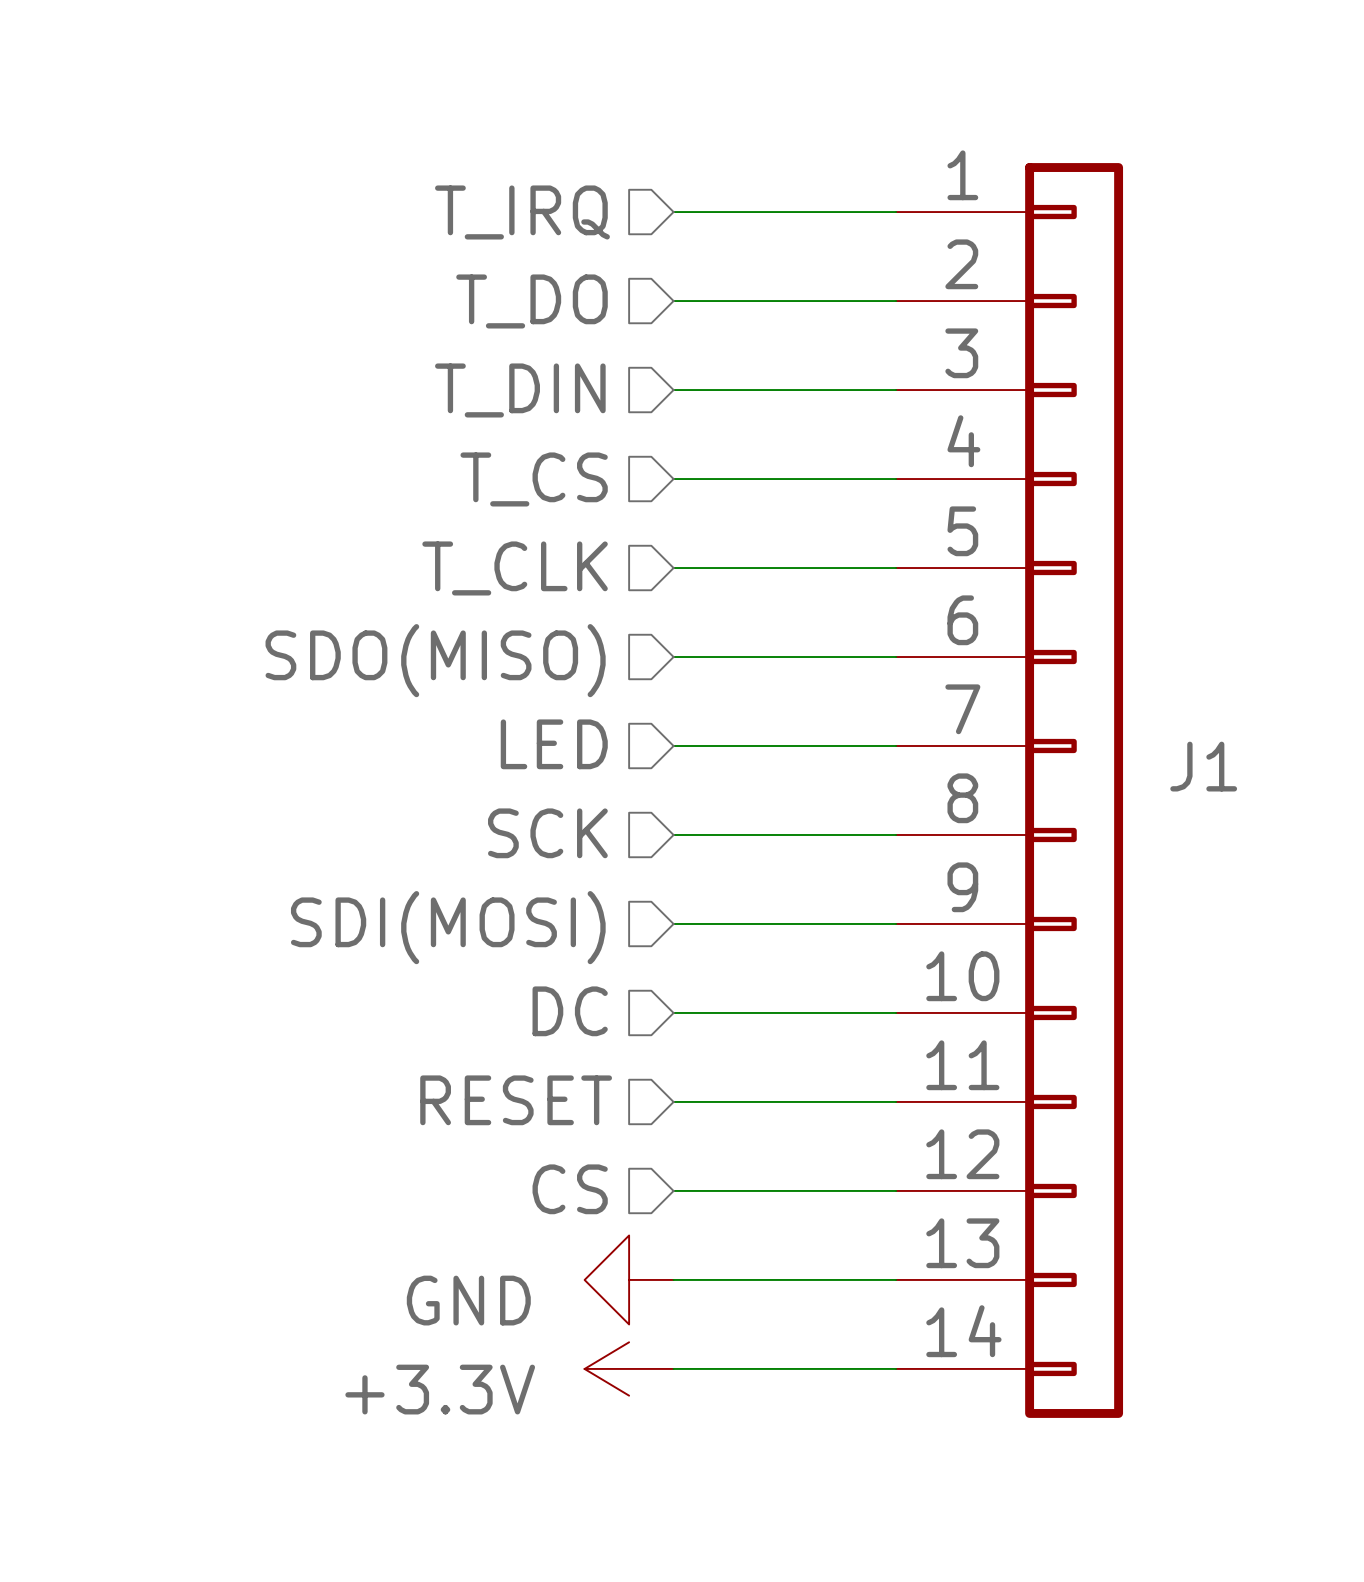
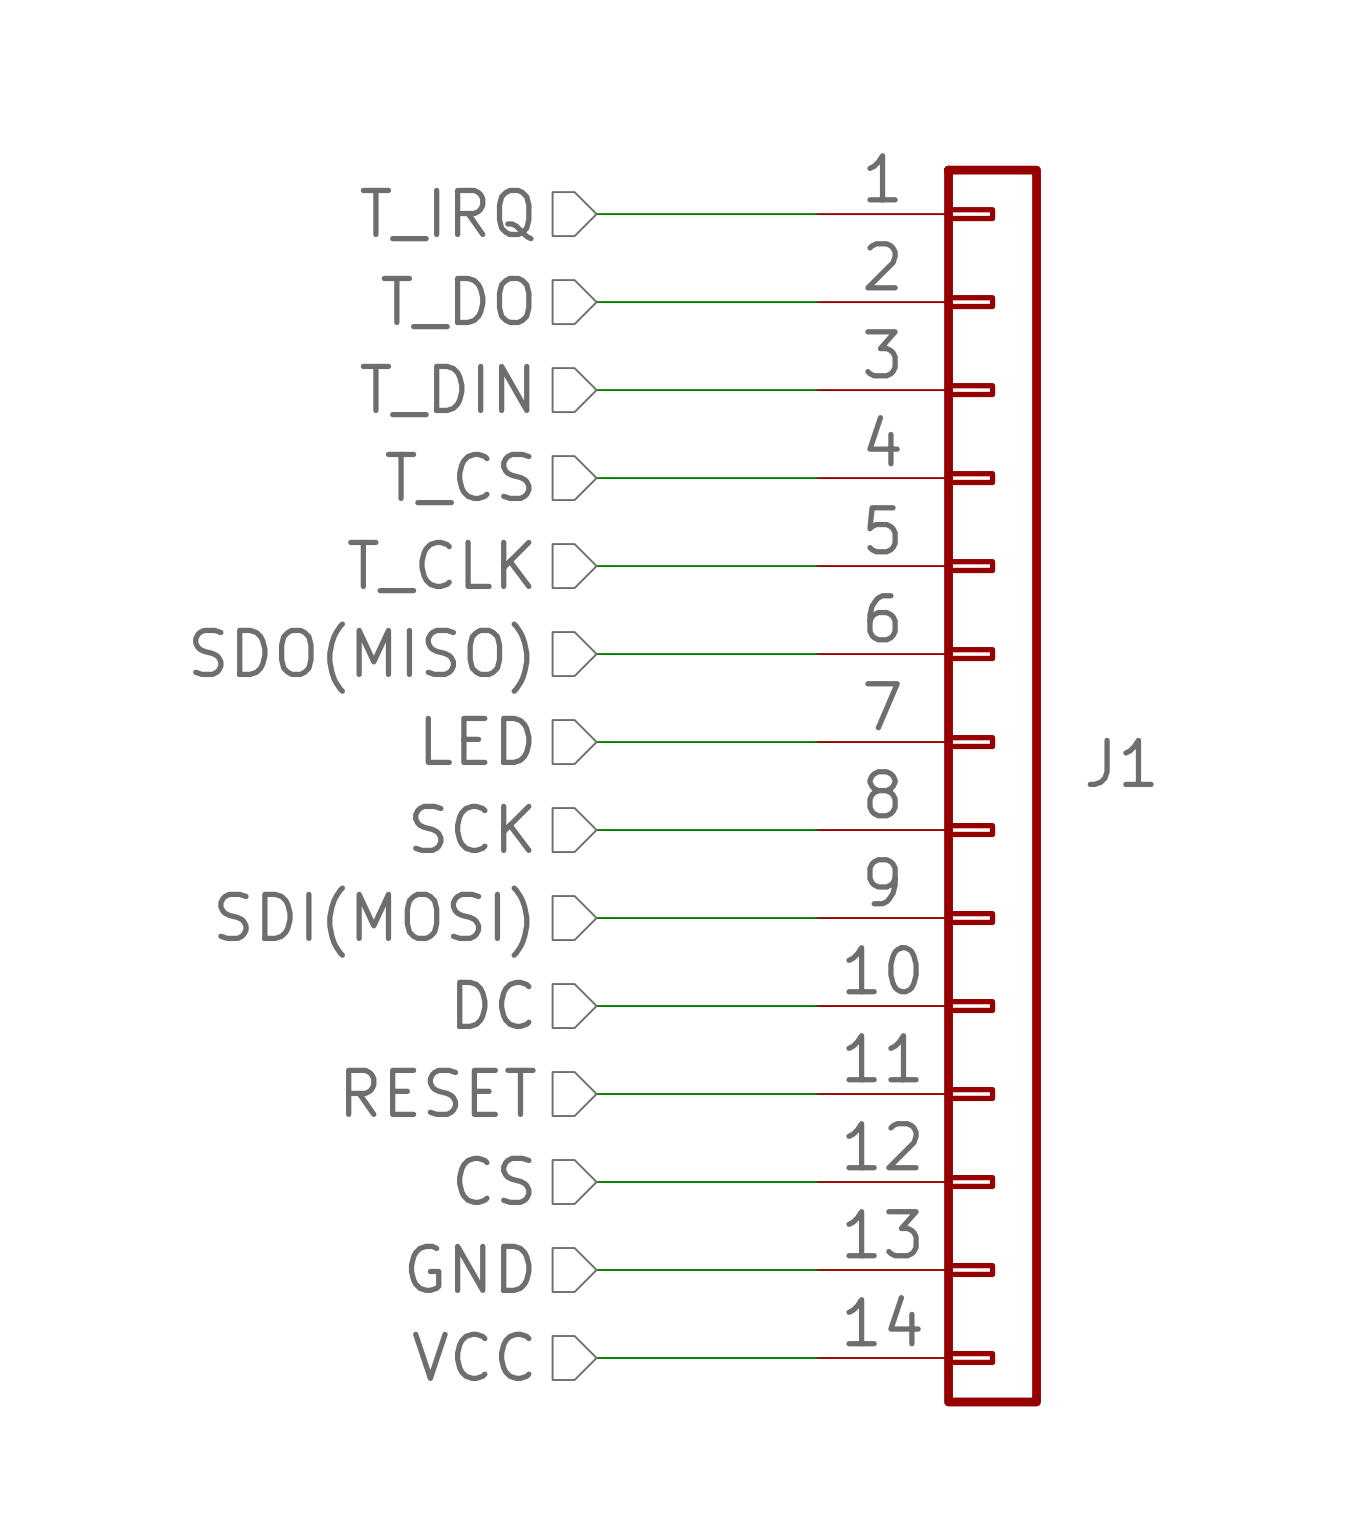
hierarchical label: none -> GND (470, 1268)
power symbol: GND (629, 1279) -> none
hierarchical label: none -> VCC (472, 1356)
power symbol: +3.3V (629, 1368) -> none

